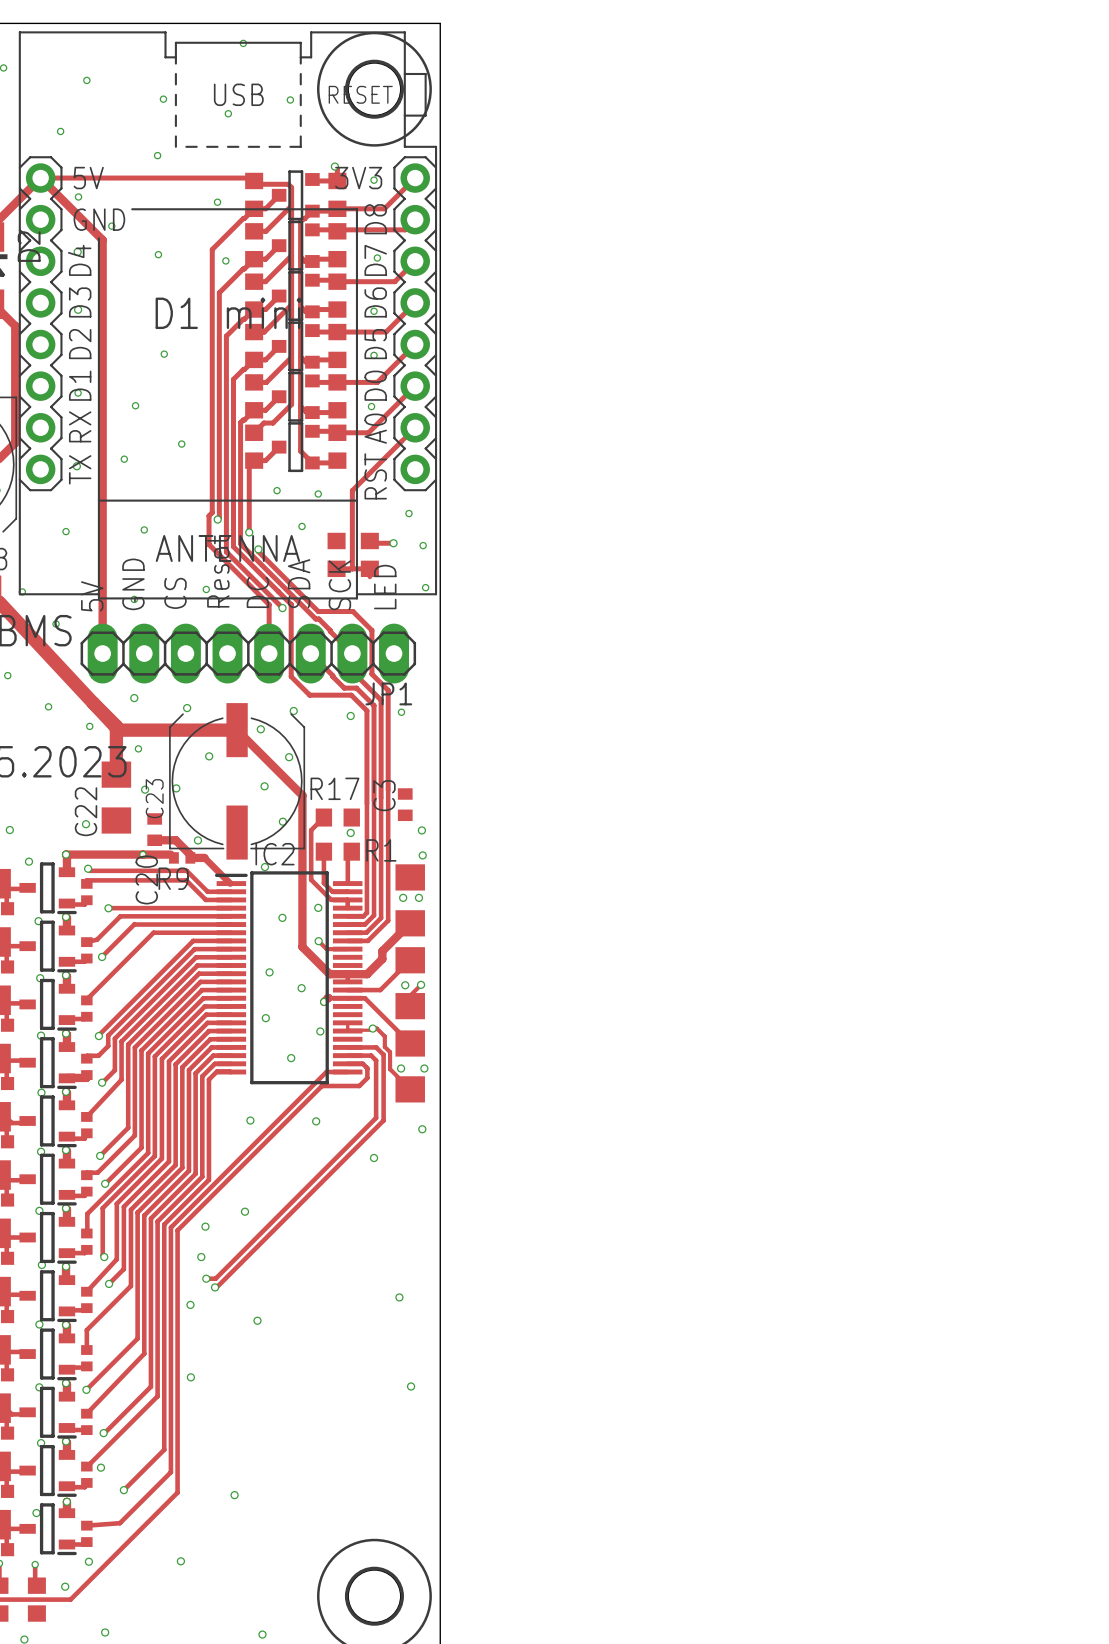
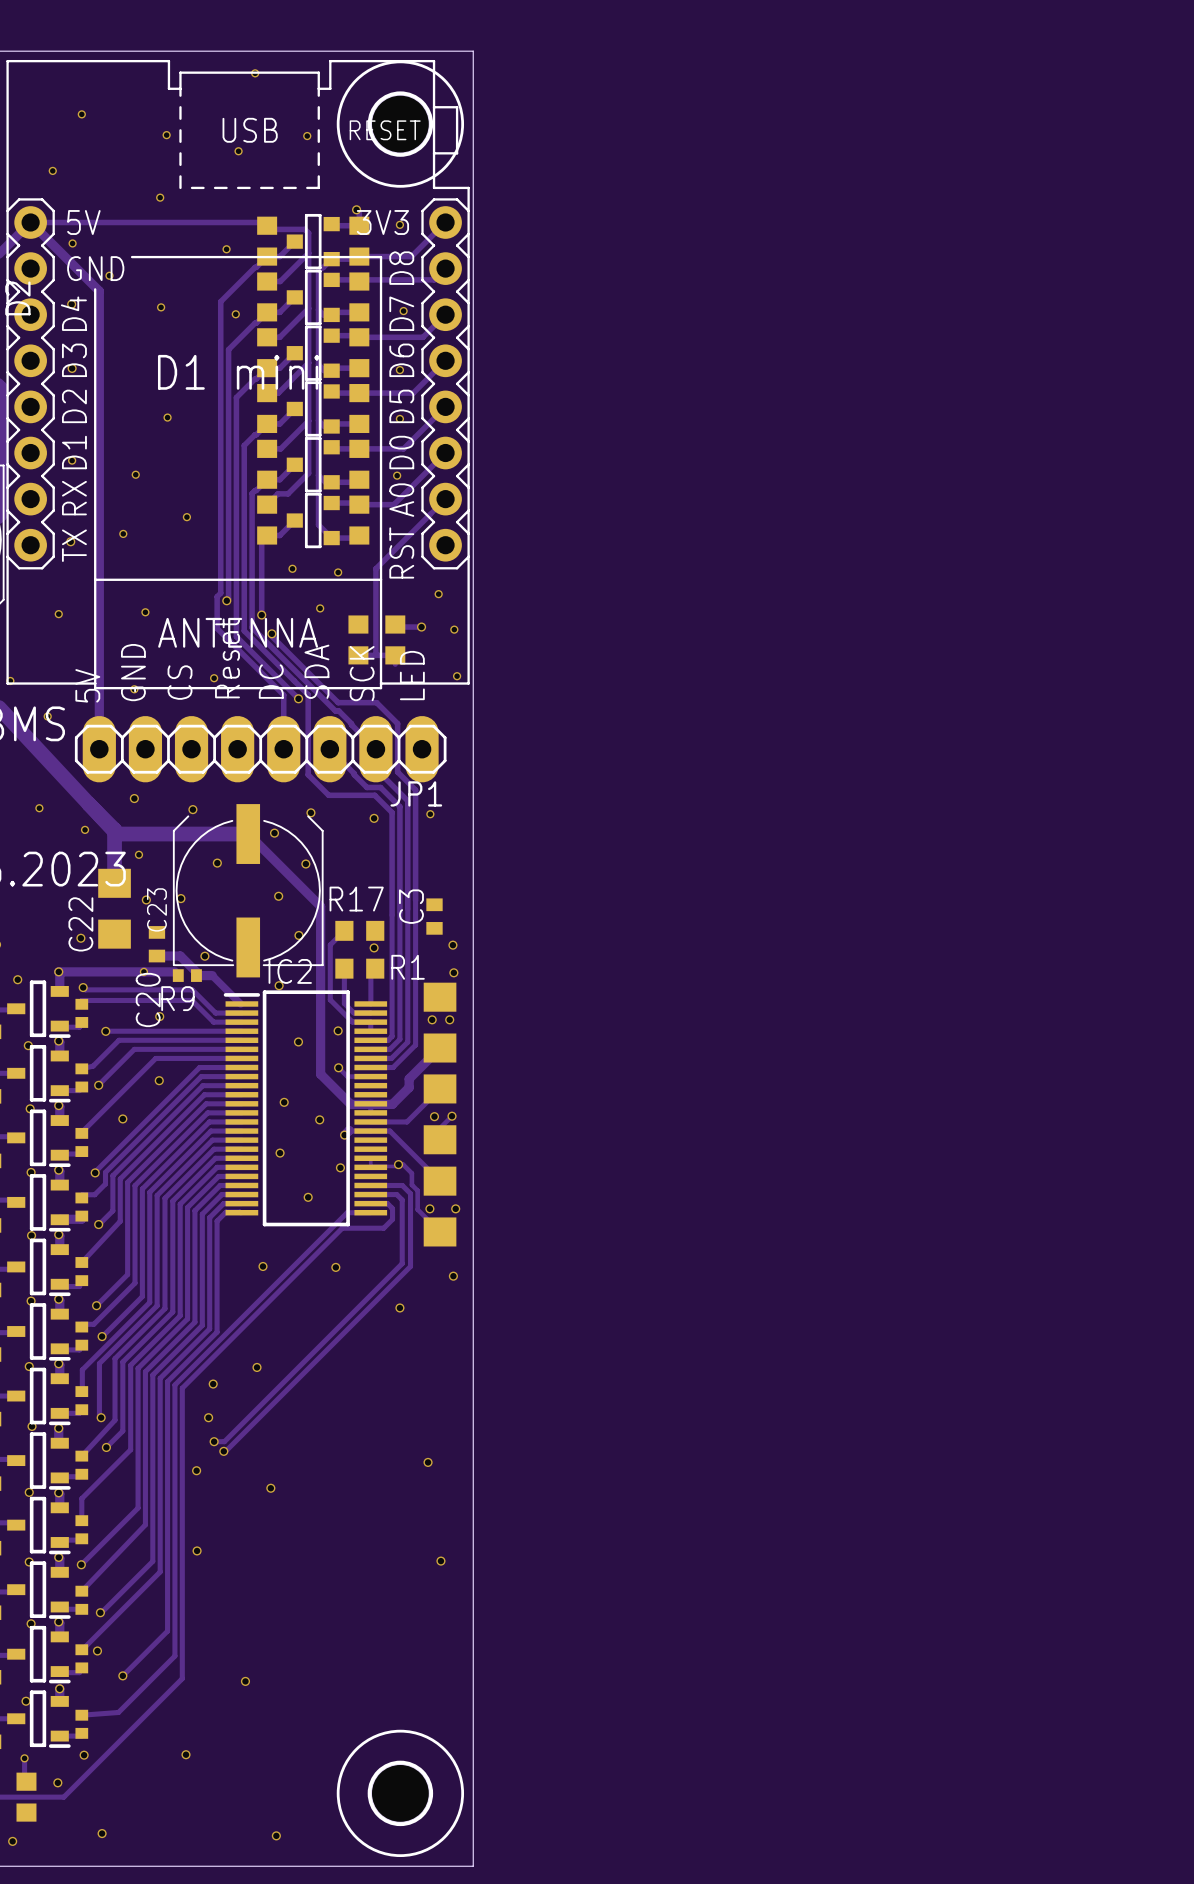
via: none -> (159, 1016)
via: none -> (159, 1080)
via: none -> (122, 1118)

